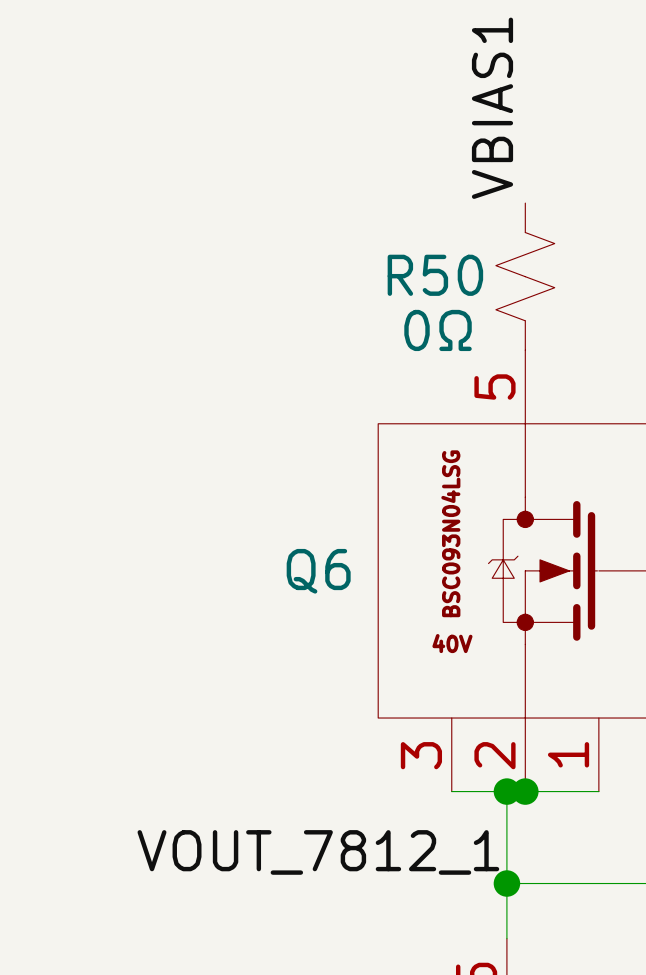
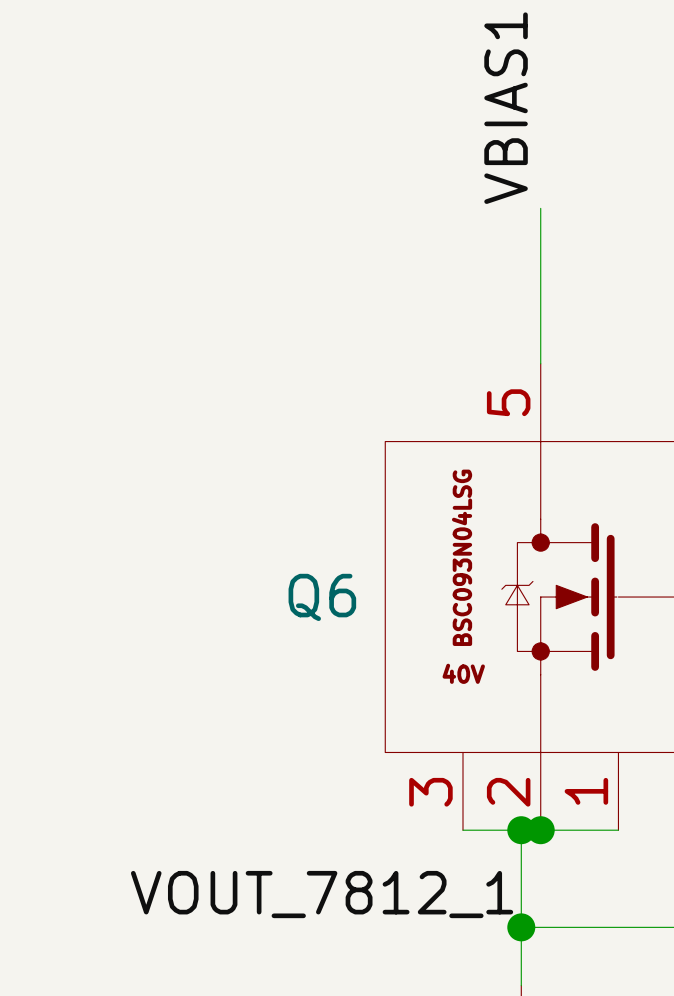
wire: none -> (540, 208) (540, 363)
R50: (525, 276) -> none

